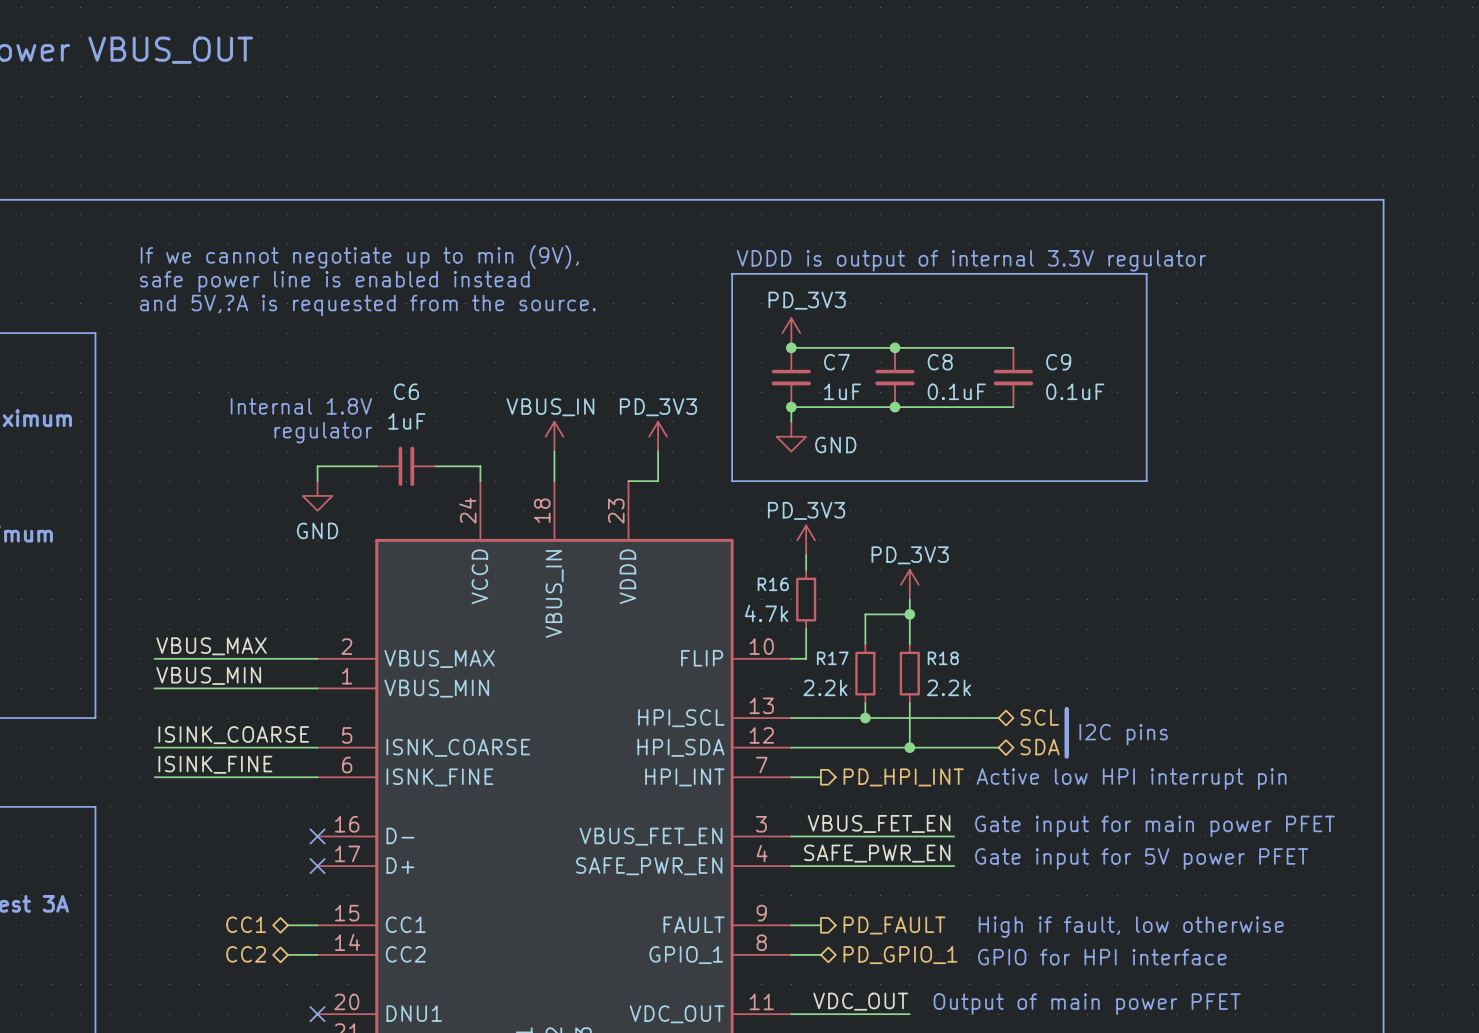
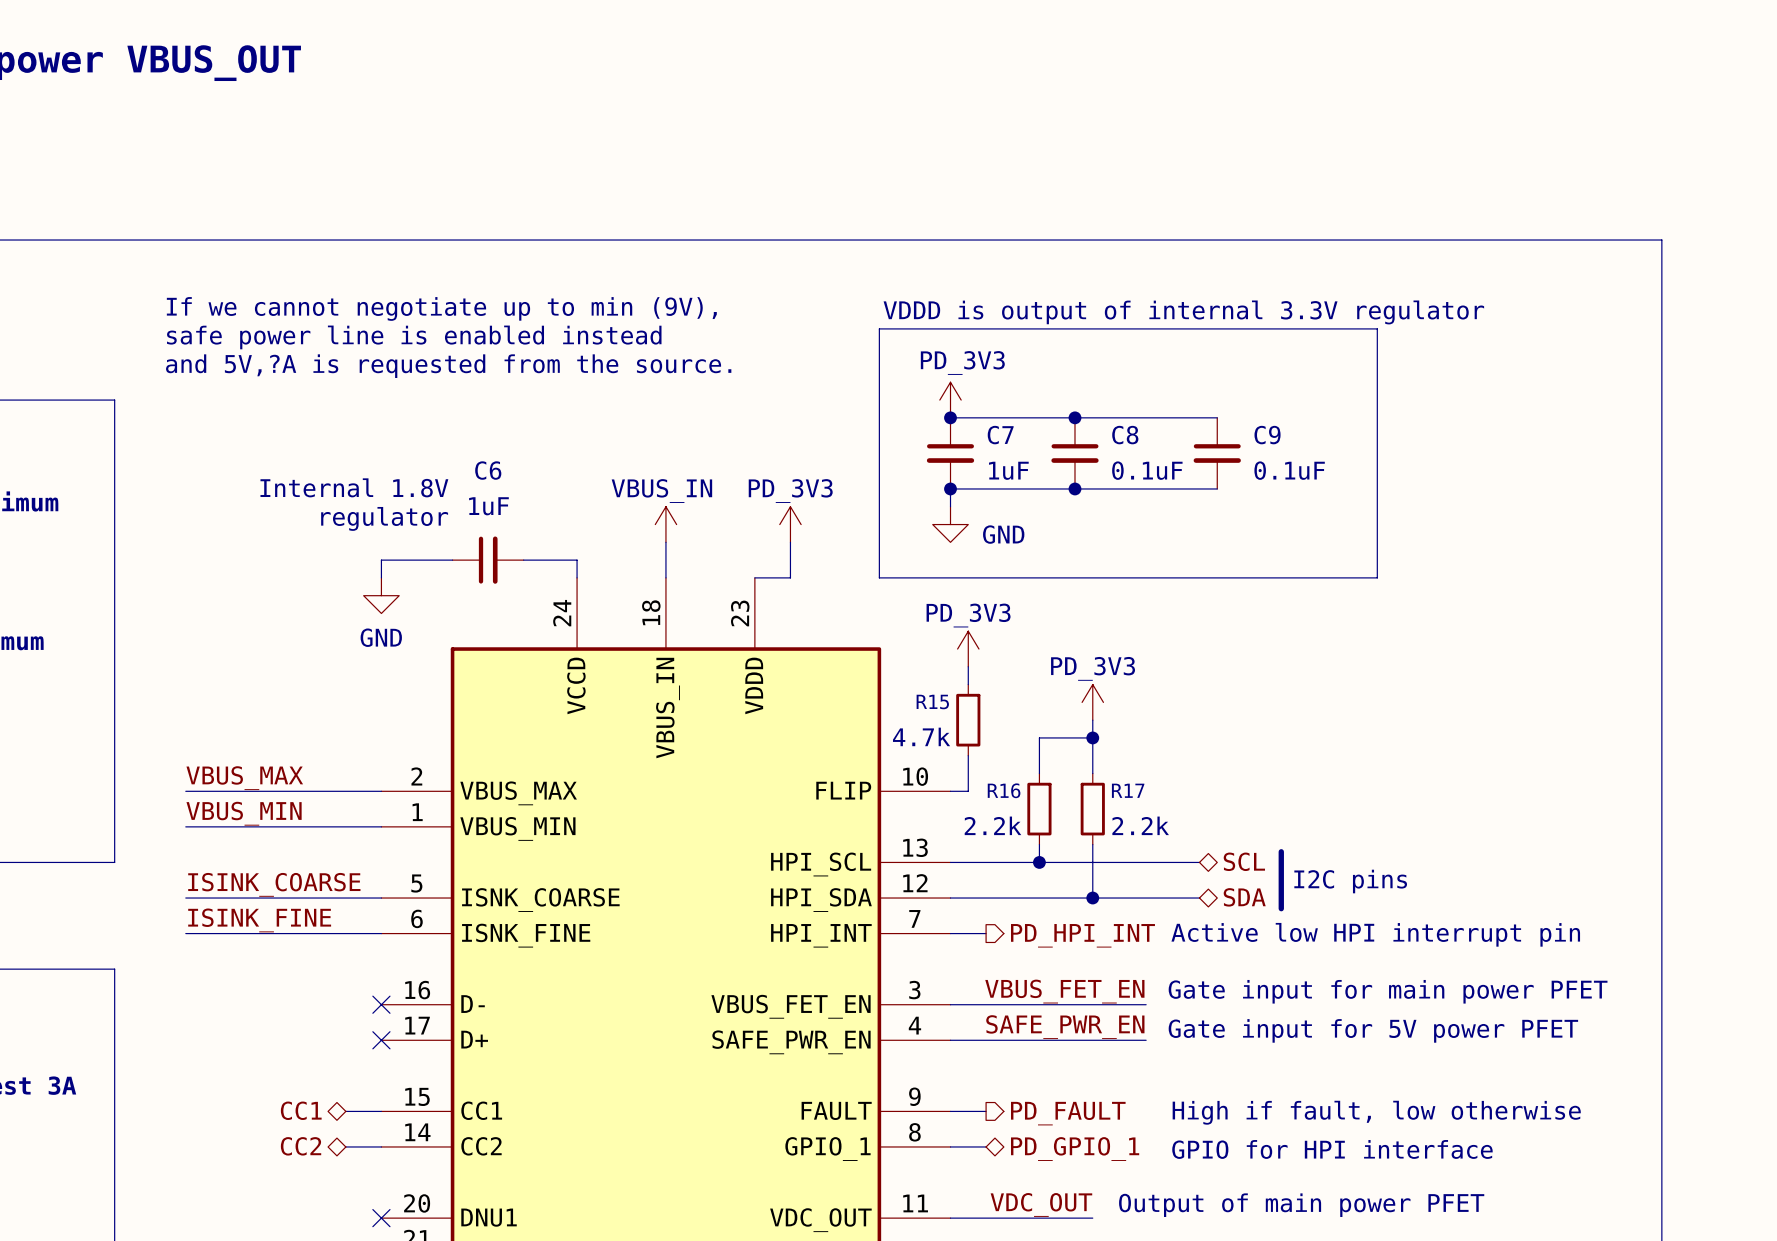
R16 name: R16 (773, 584) -> R15 (932, 701)
R17 name: R17 (832, 658) -> R16 (1004, 790)
R18 name: R18 (943, 658) -> R17 (1128, 790)

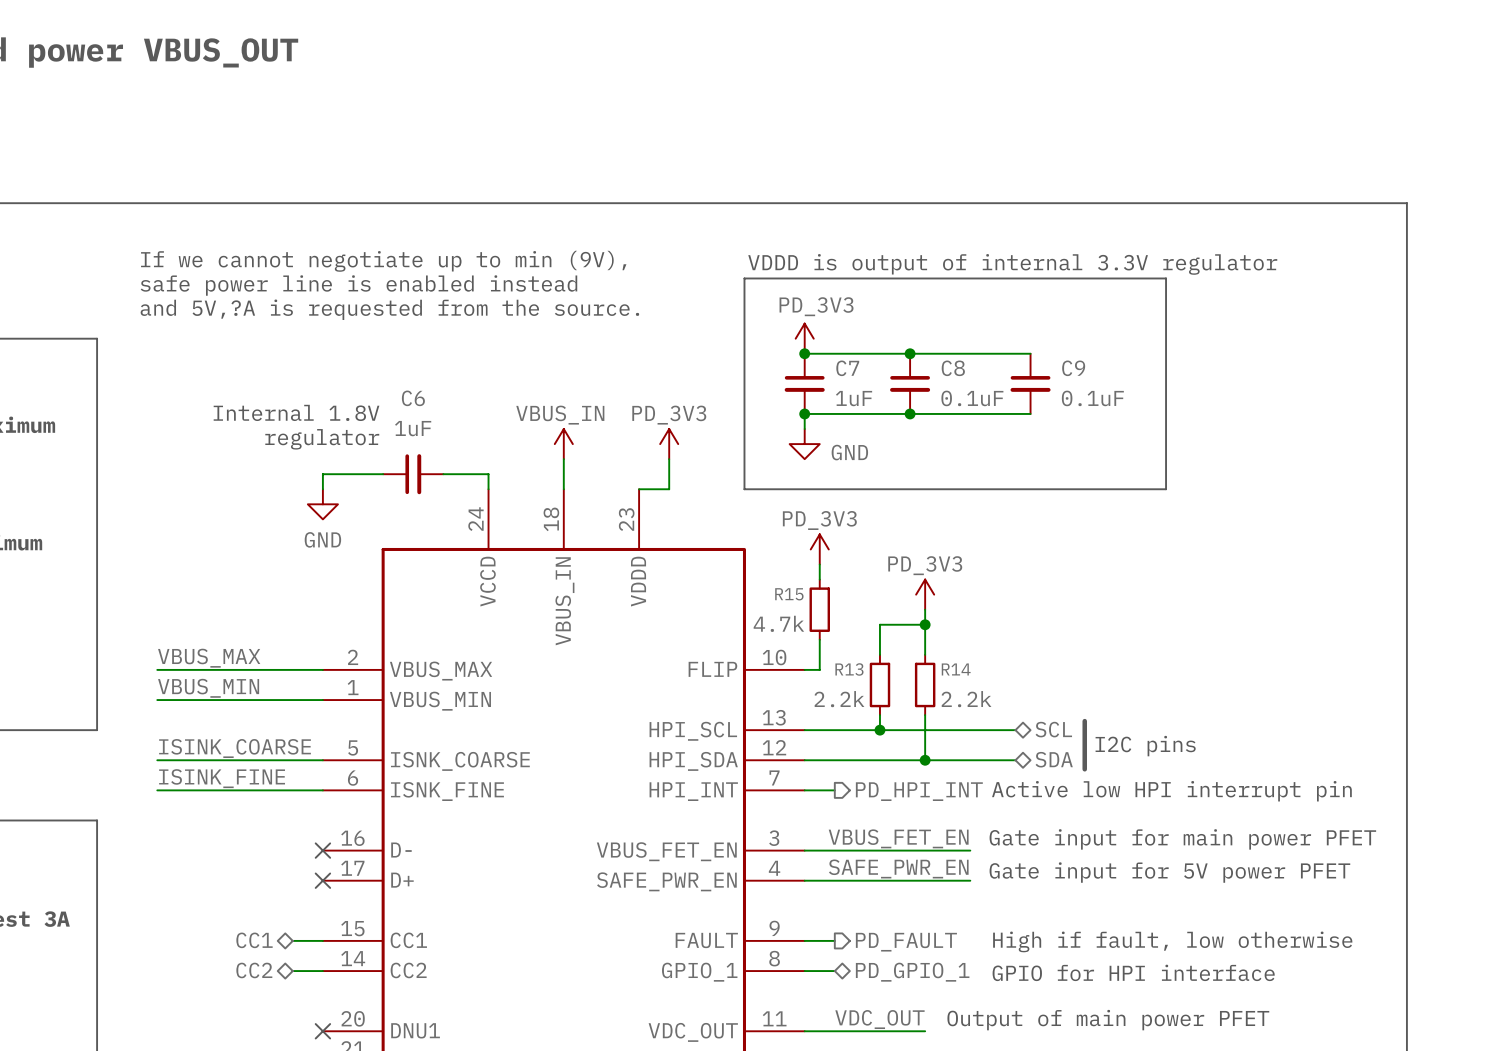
R16 name: R16 (1004, 790) -> R13 (849, 669)
R17 name: R17 (1128, 790) -> R14 (956, 669)

